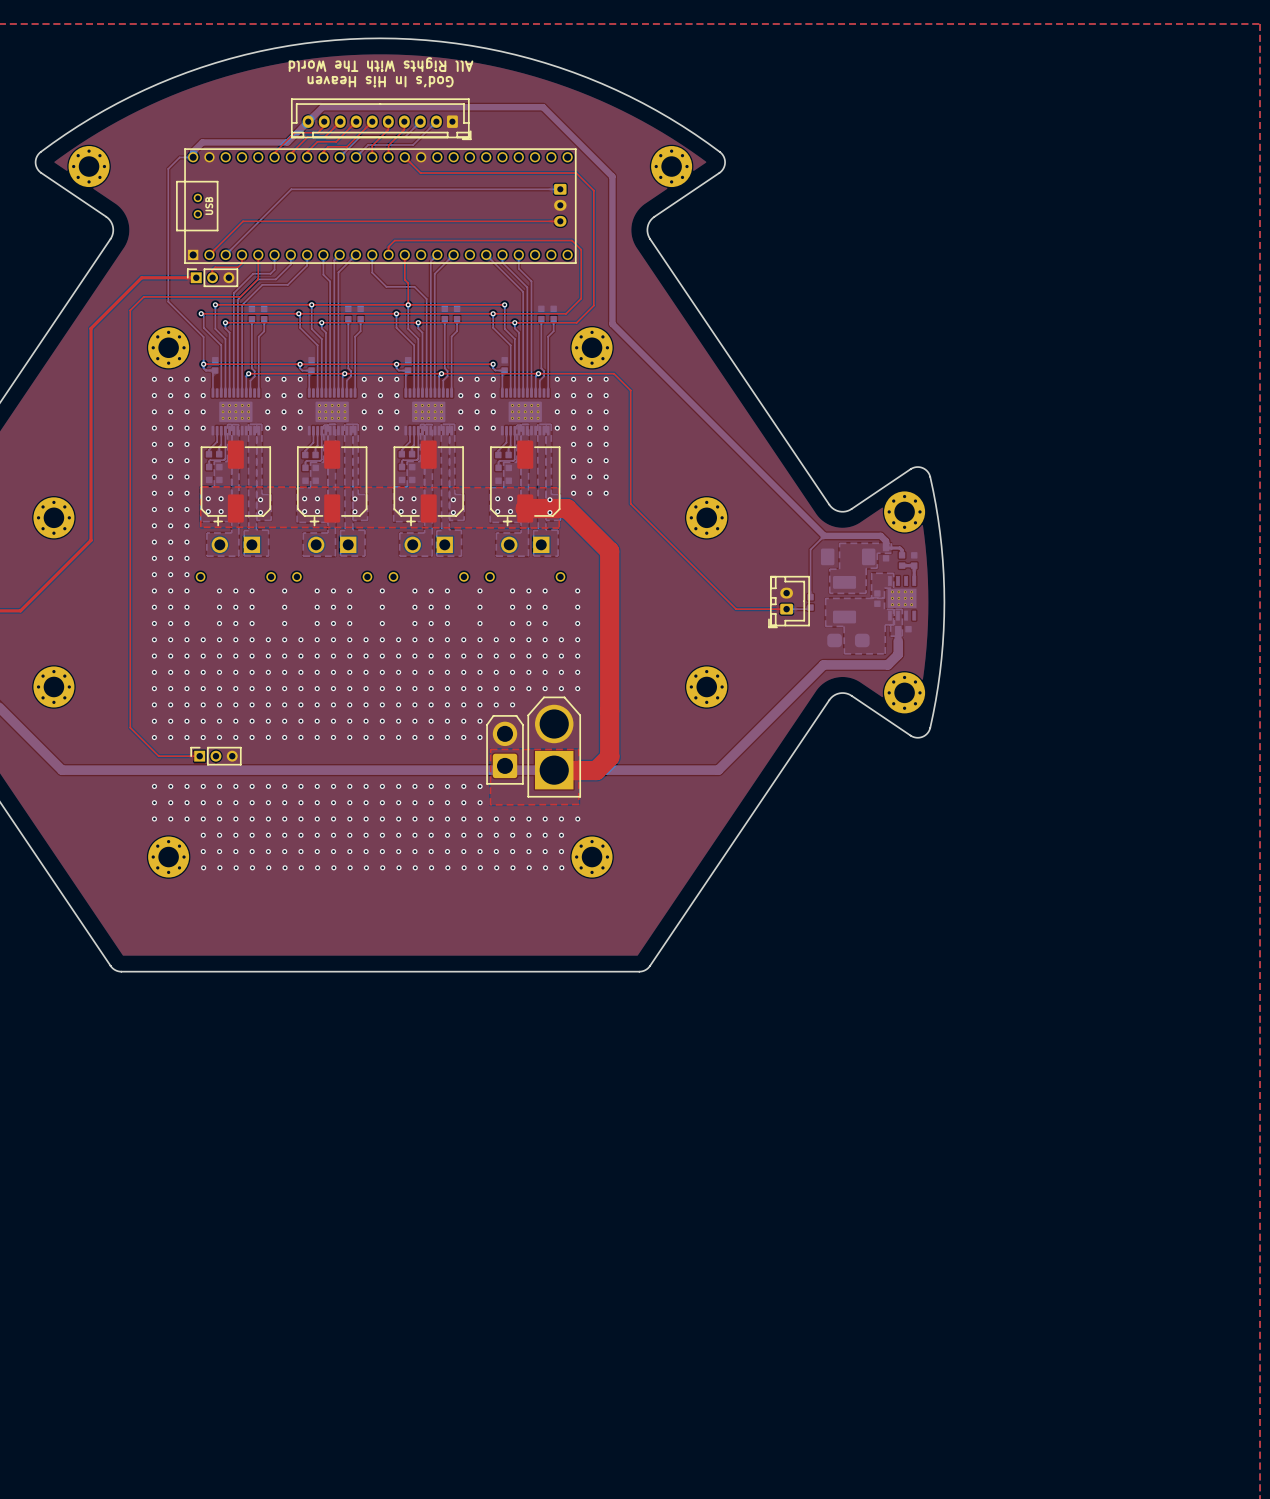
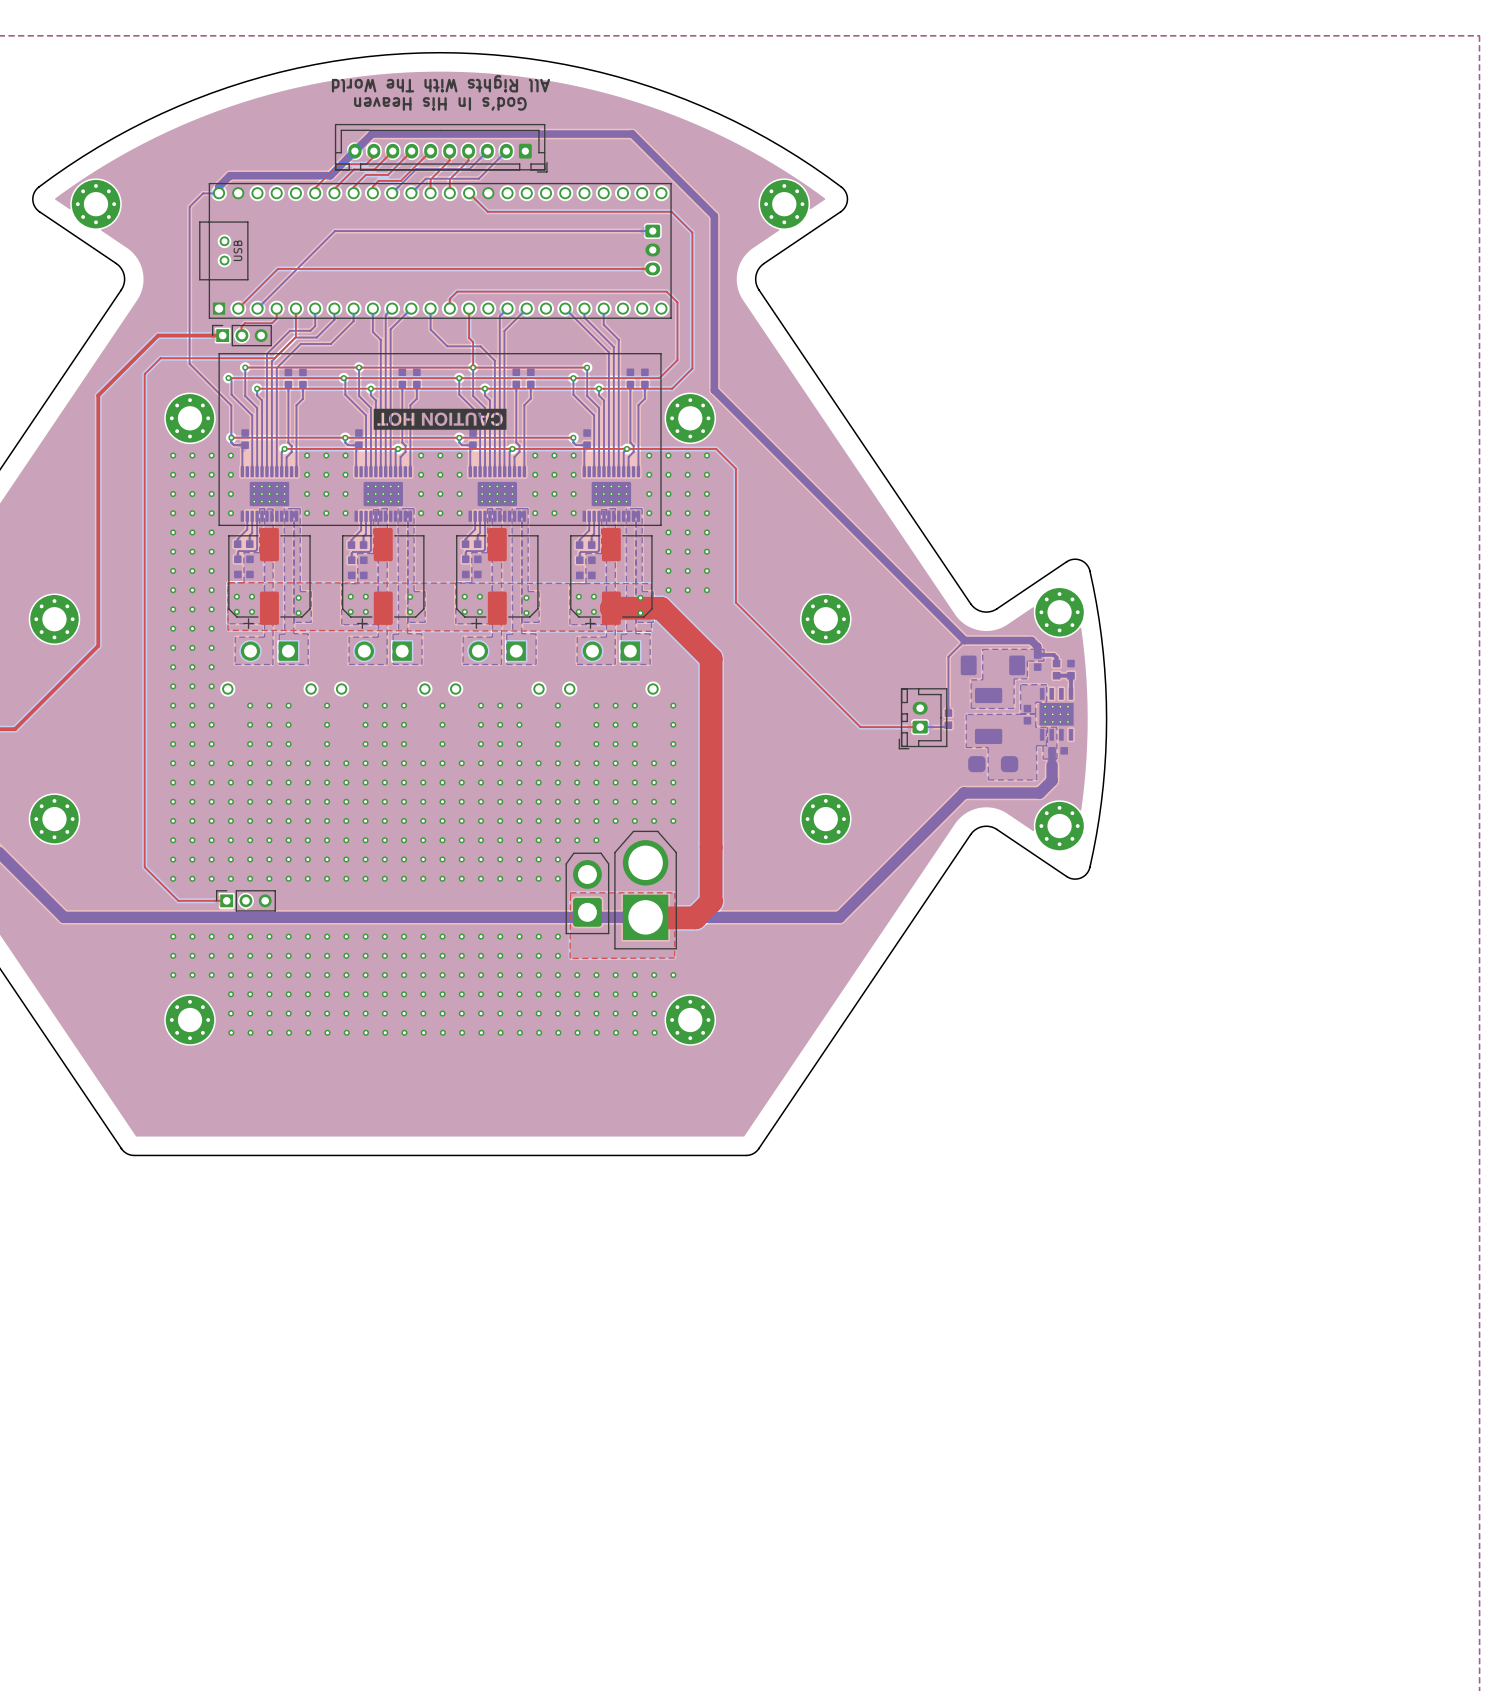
line: none -> (219, 353) (660, 353) (660, 525) (219, 525) (219, 353)
drawing: none -> [373, 408, 507, 430]

